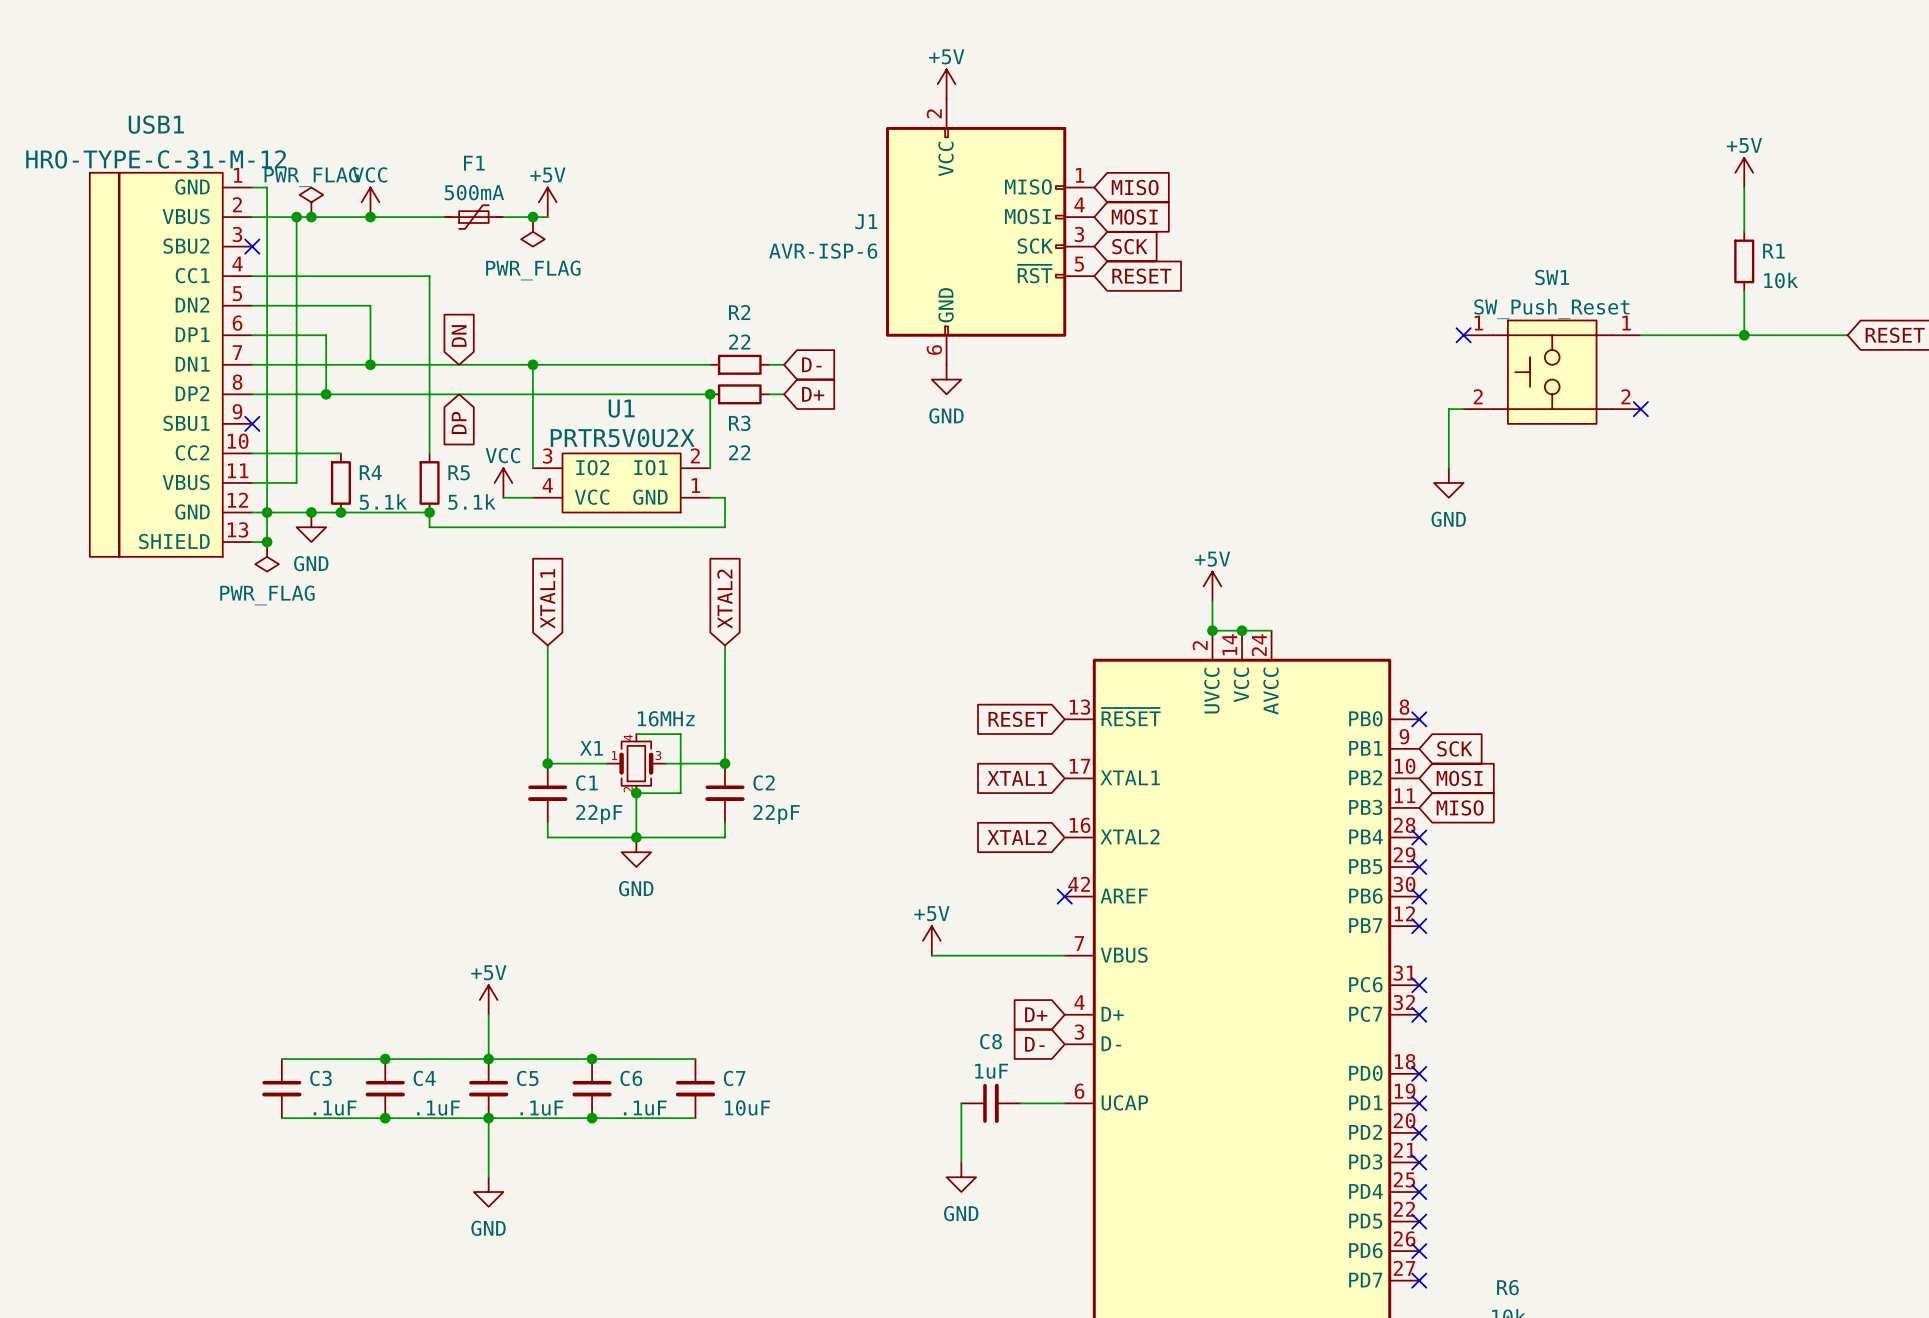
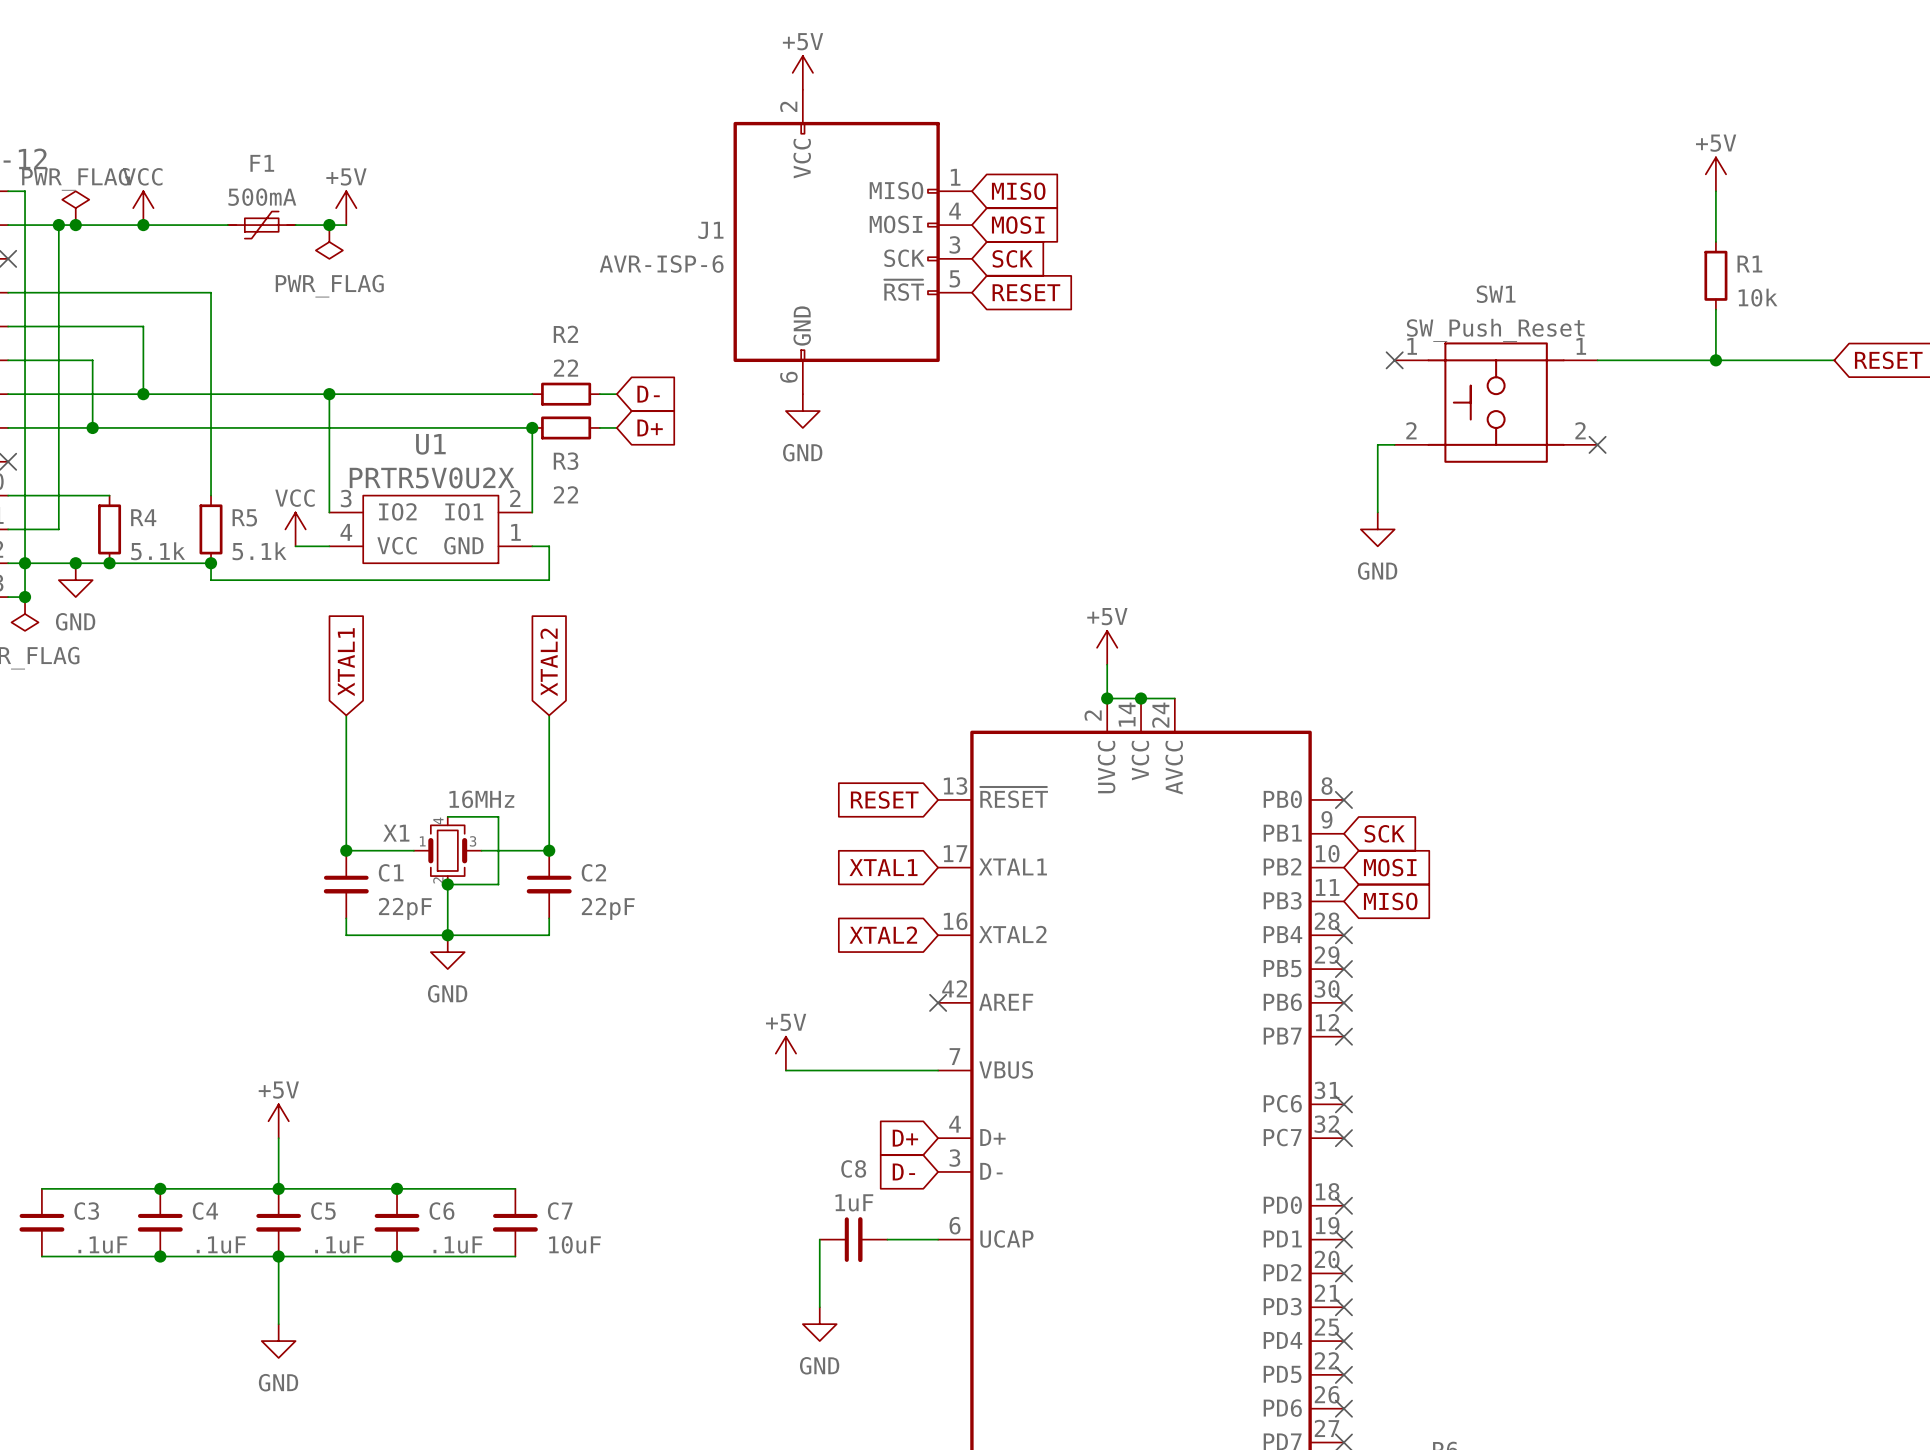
global label: DN (459, 335) -> none
global label: DP (459, 422) -> none

